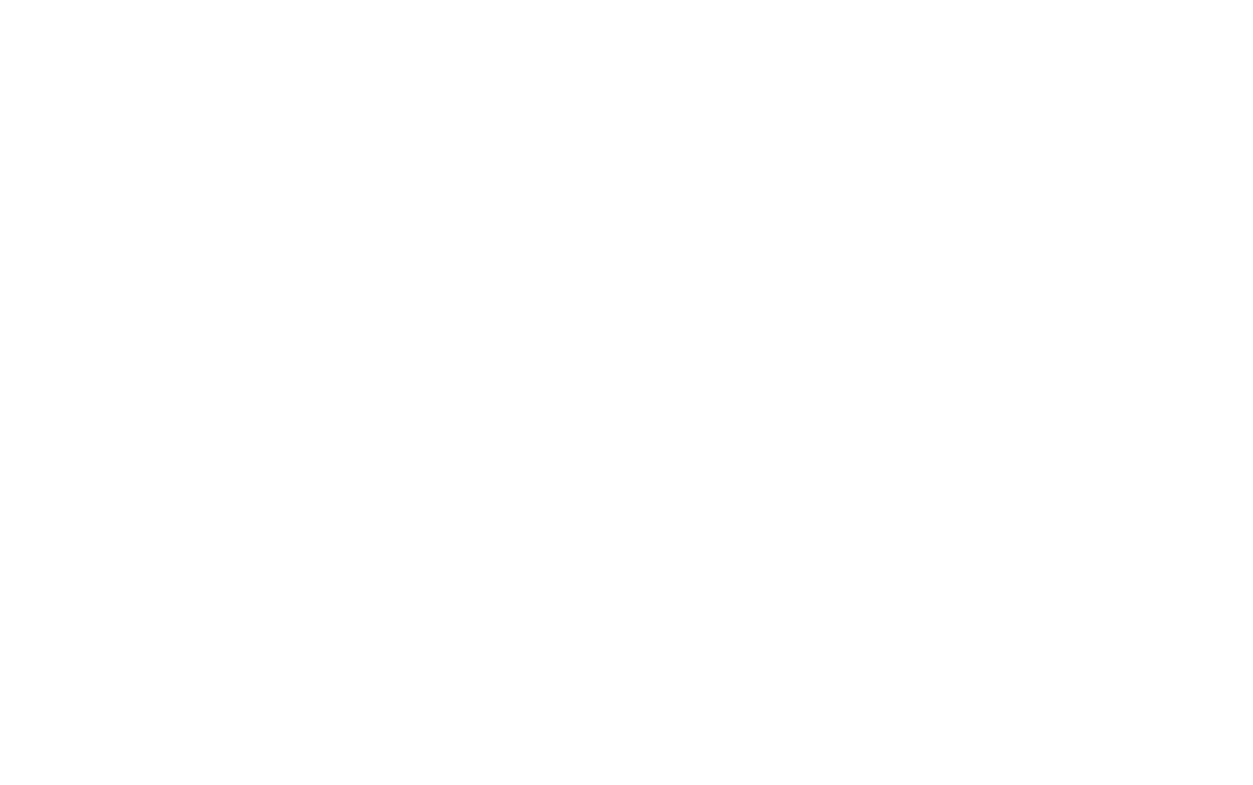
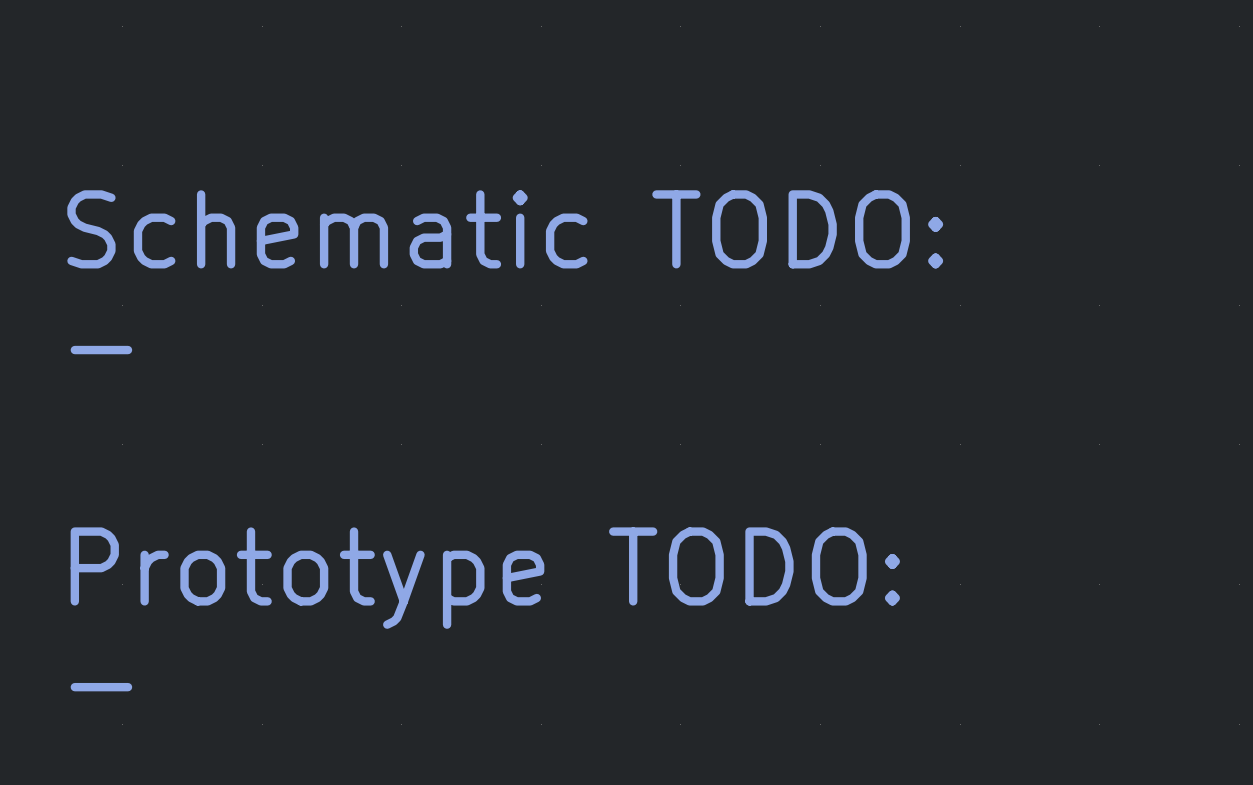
text: none -> Schematic TODO: (505, 229)
text: none -> - (101, 350)
text: none -> Prototype TODO: (485, 578)
text: none -> - (101, 687)

